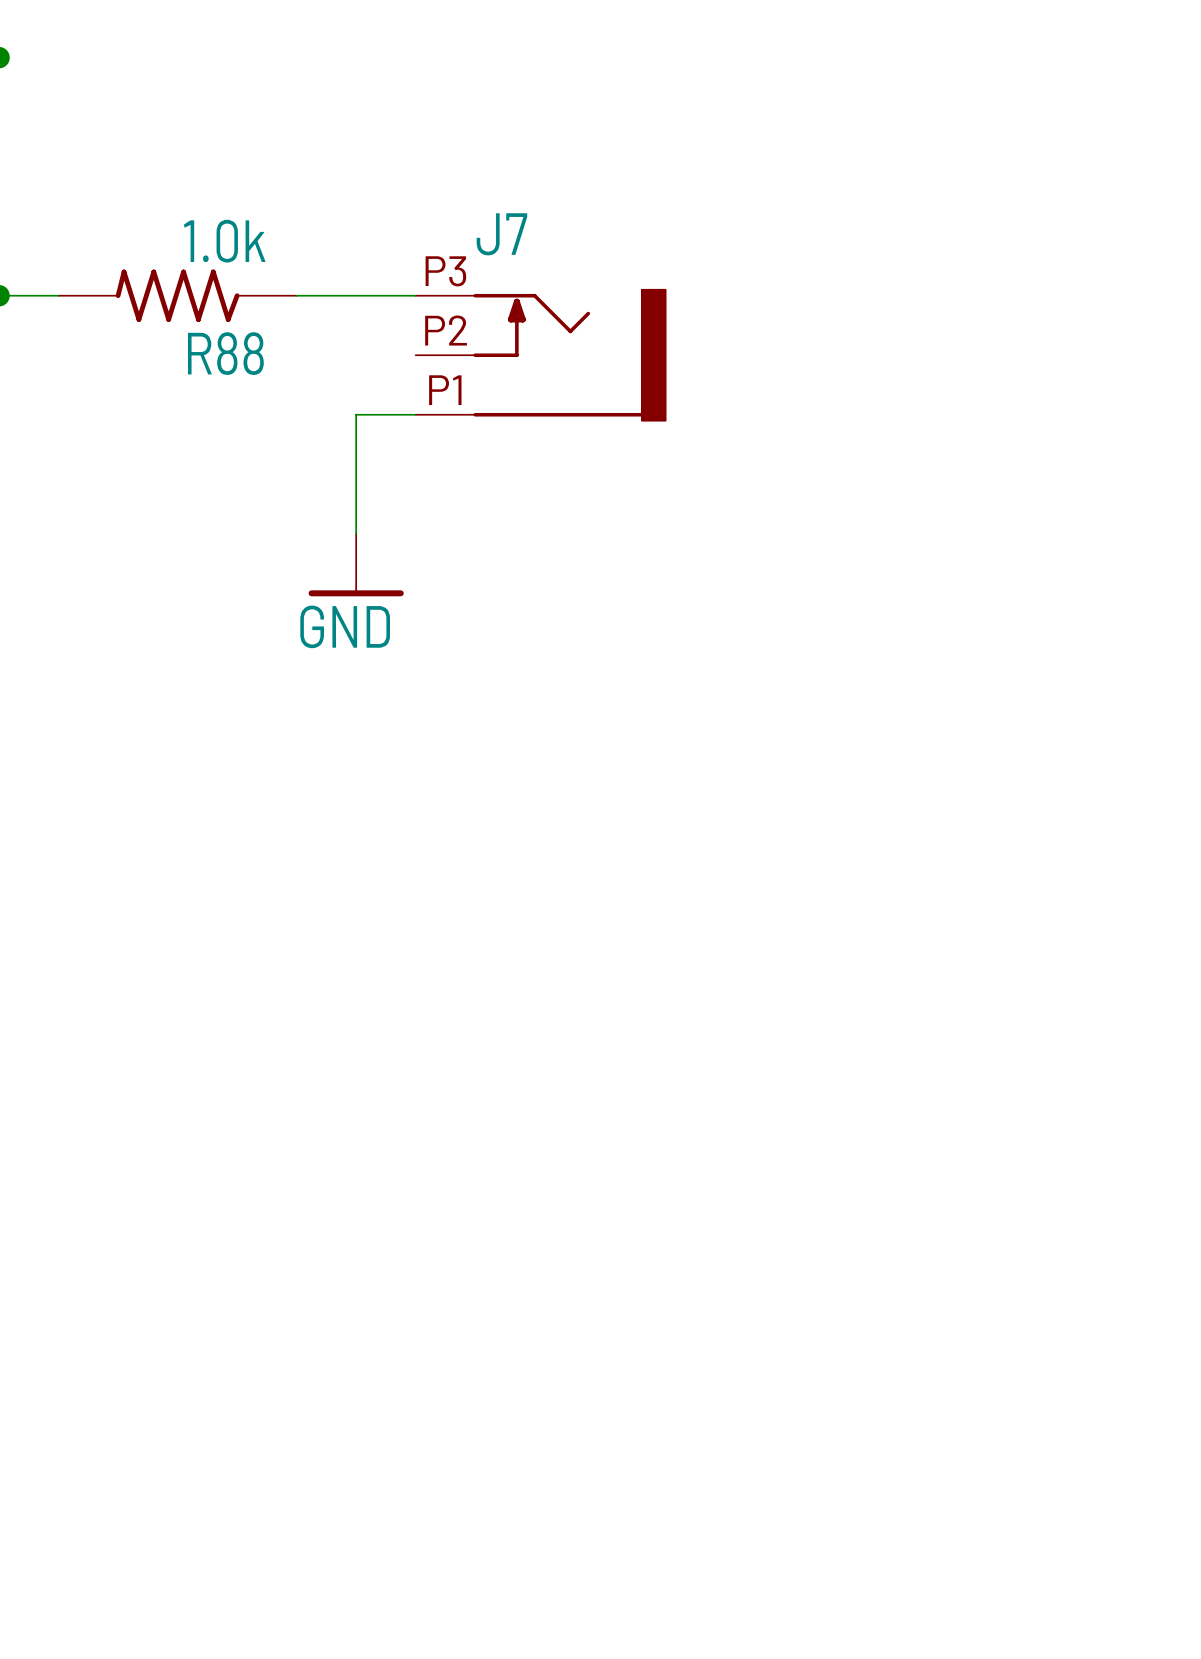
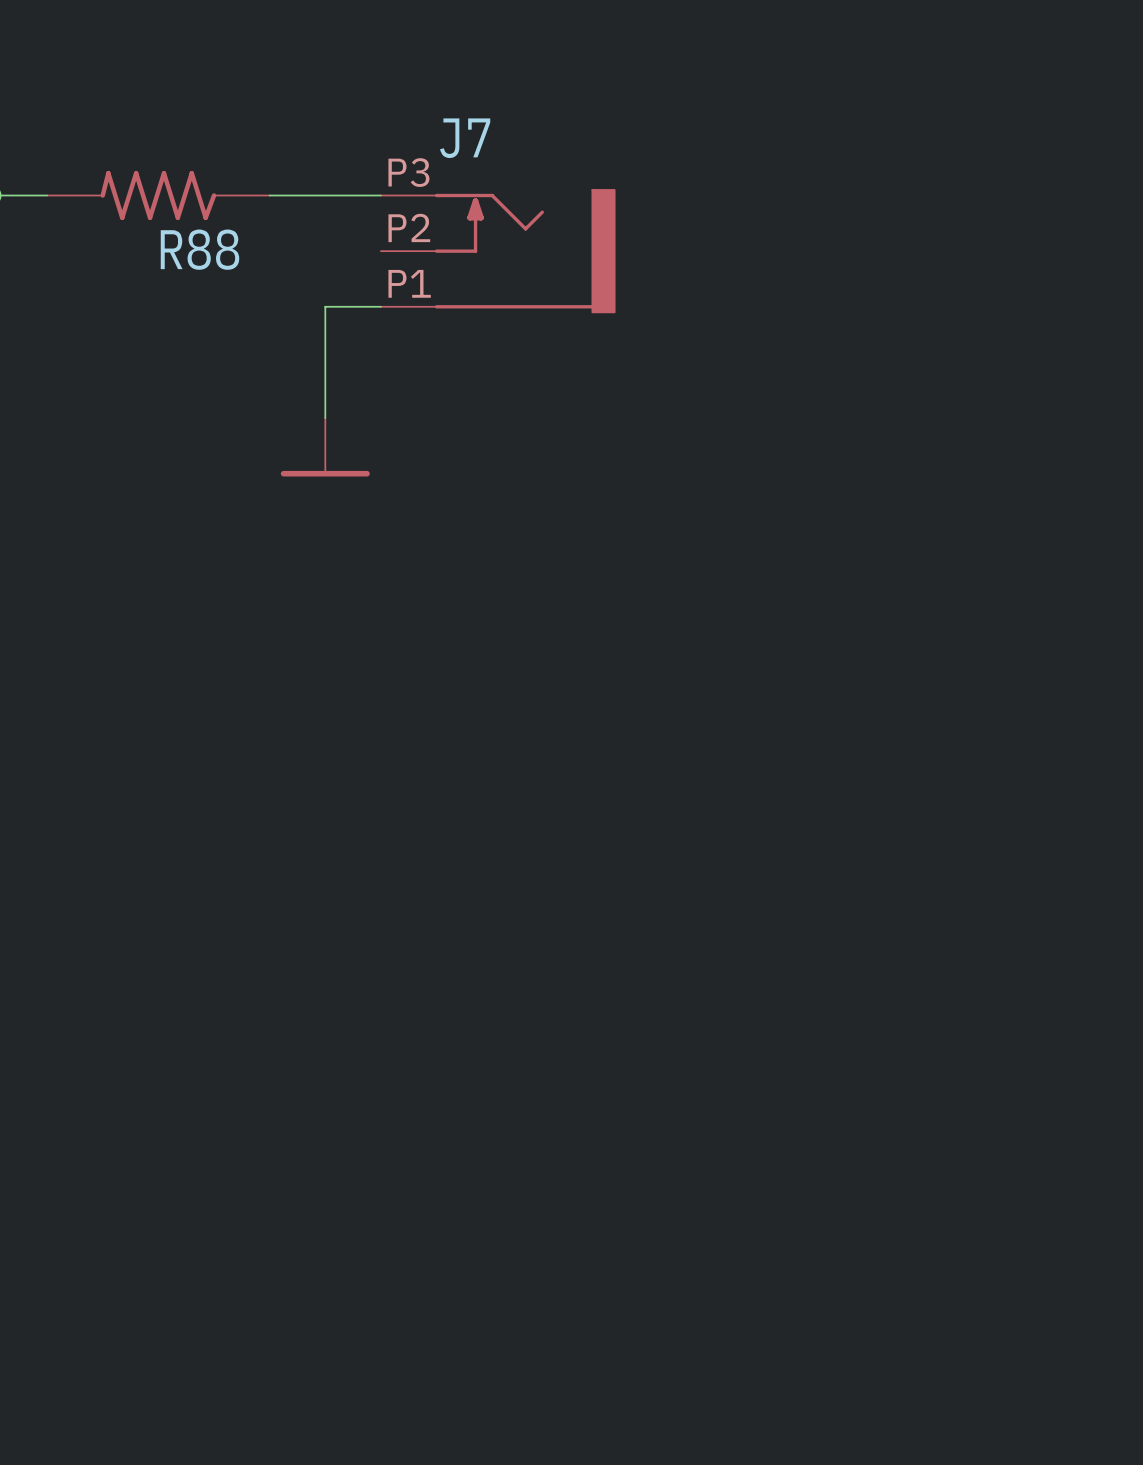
R88 value: 1.0k (224, 241) -> none
power symbol text: GND (345, 626) -> none

